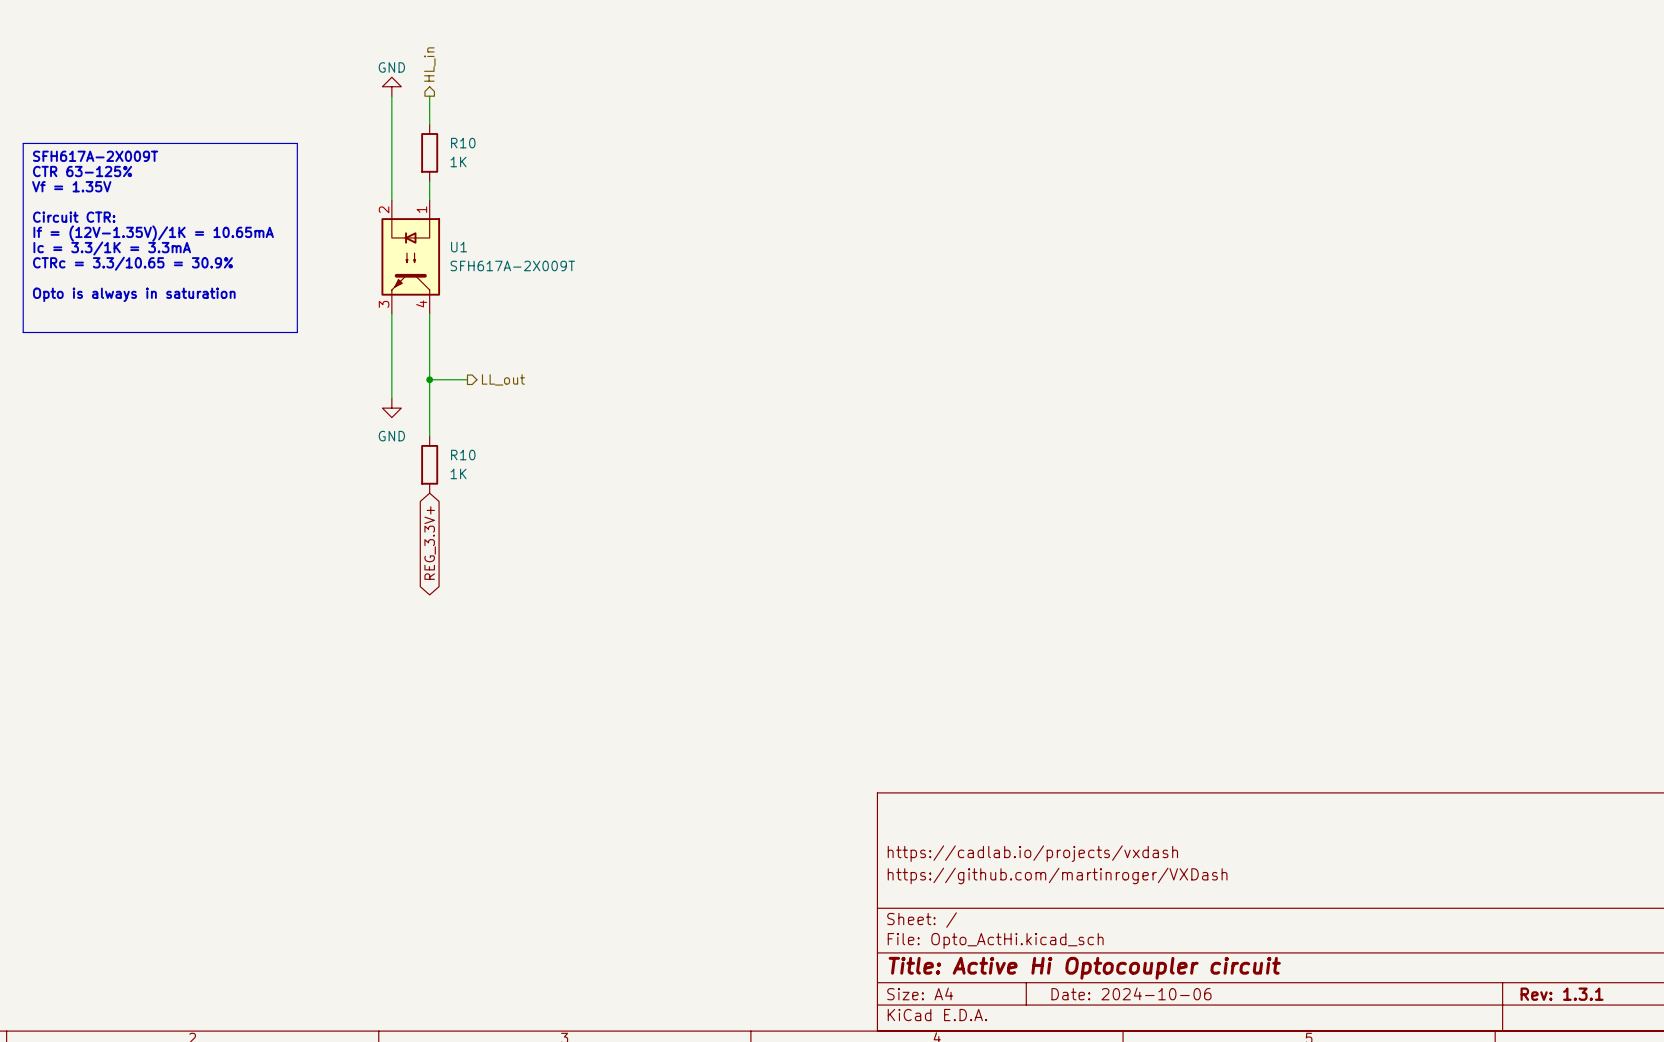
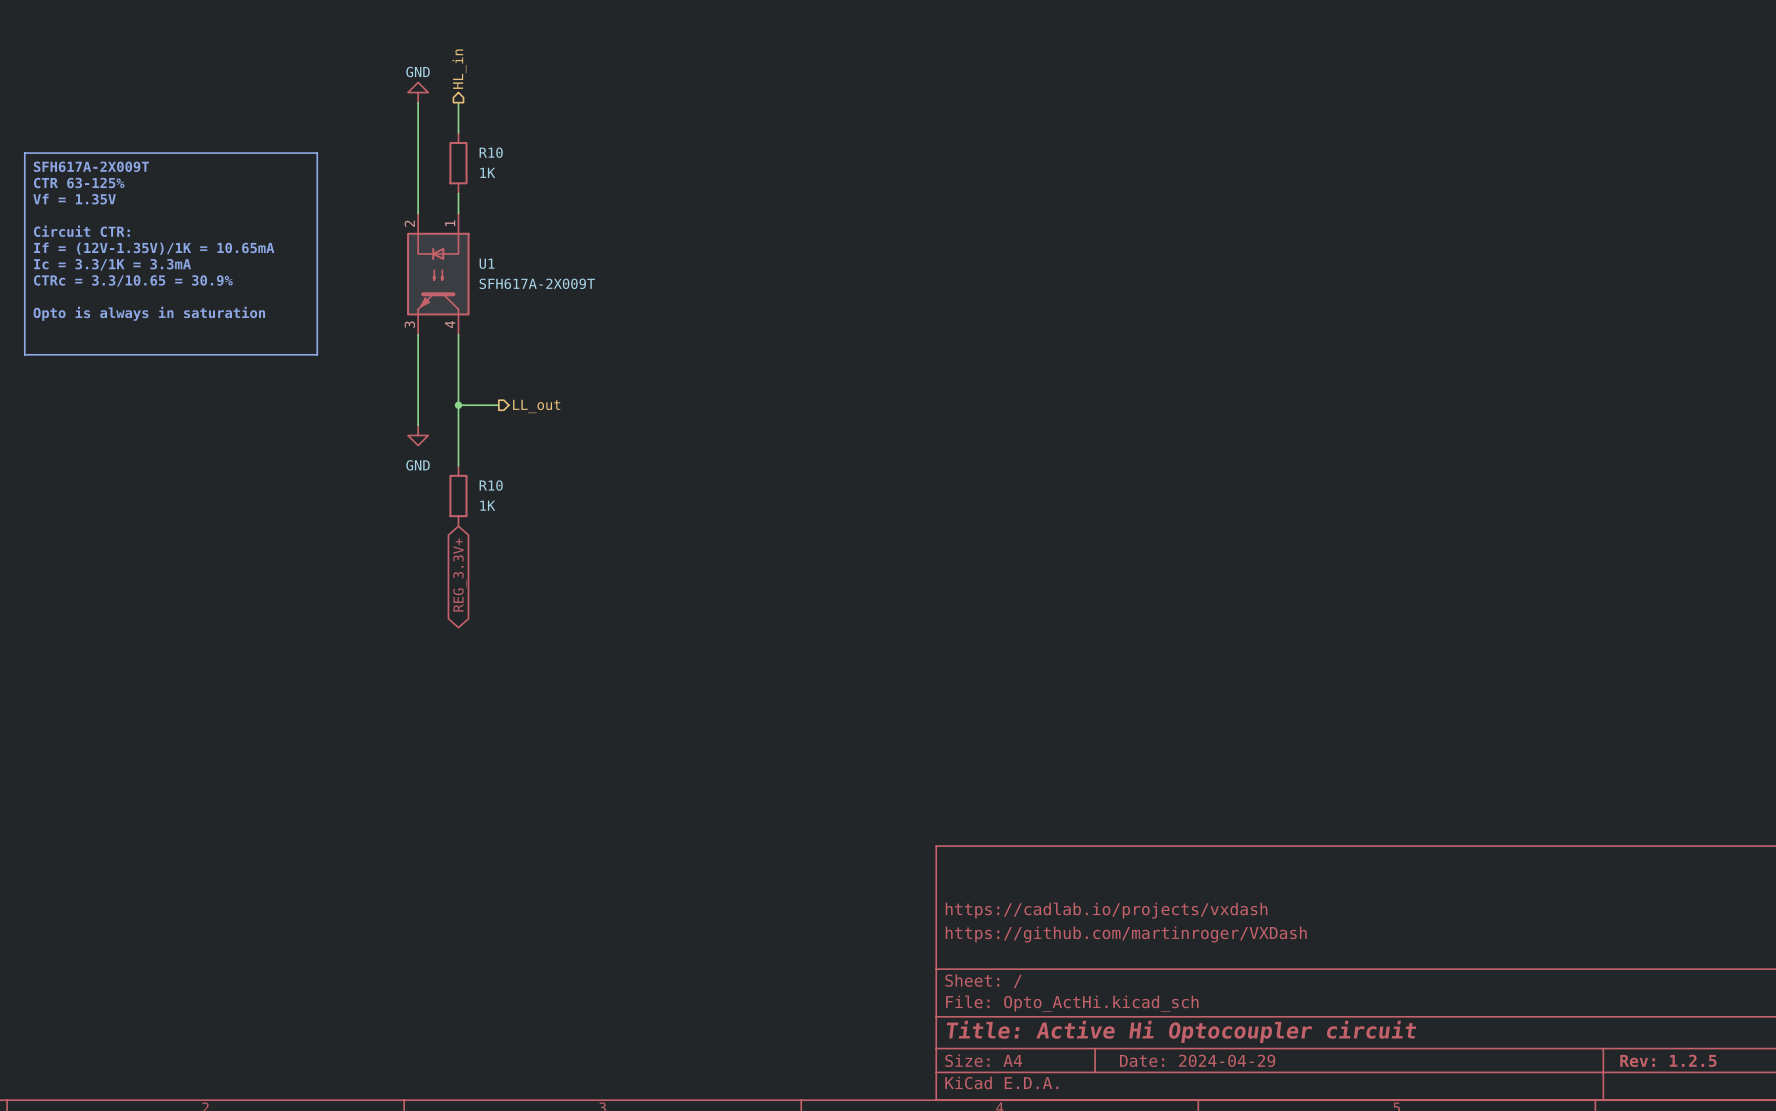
title block: Date: 2024-10-06 (1131, 993) -> Date: 2024-04-29 (1197, 1060)
title block: Rev: 1.3.1 (1562, 994) -> Rev: 1.2.5 (1668, 1060)

